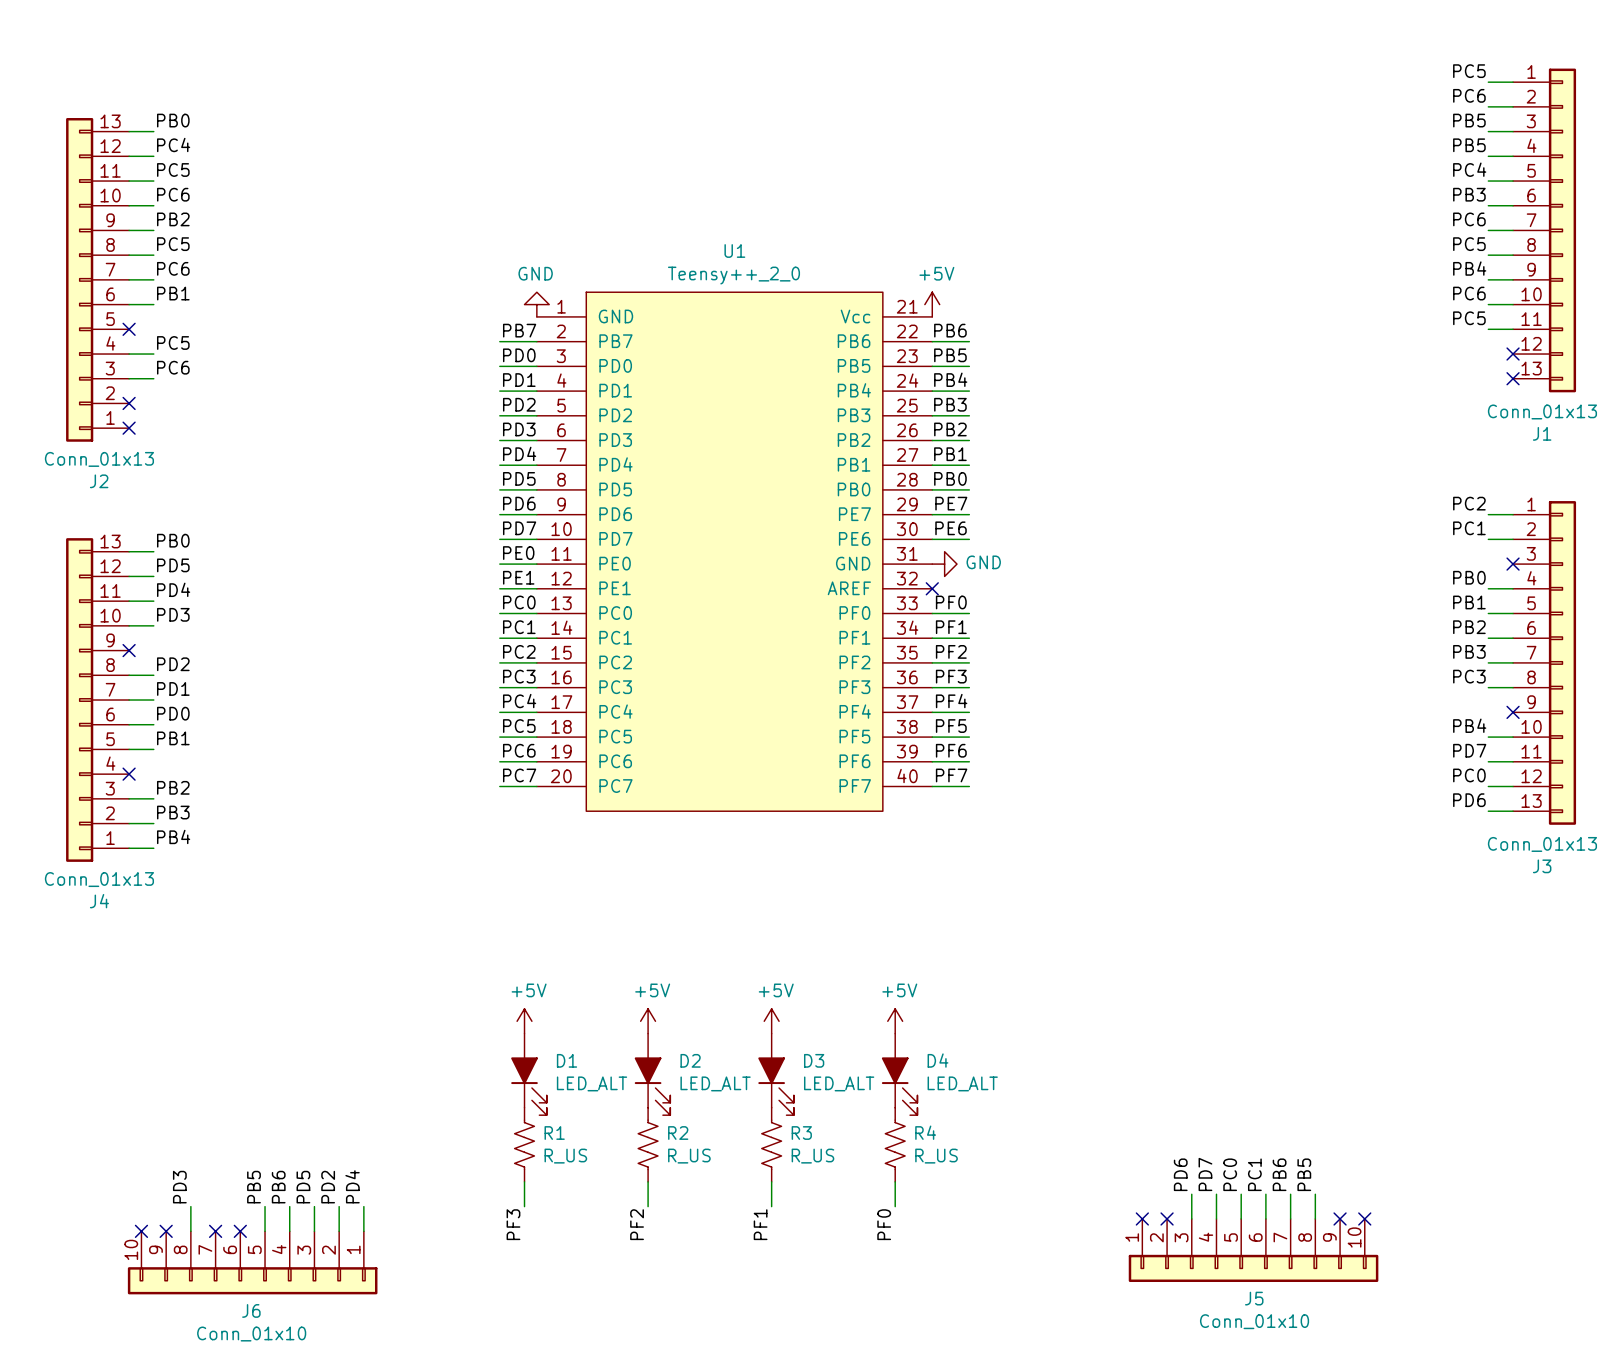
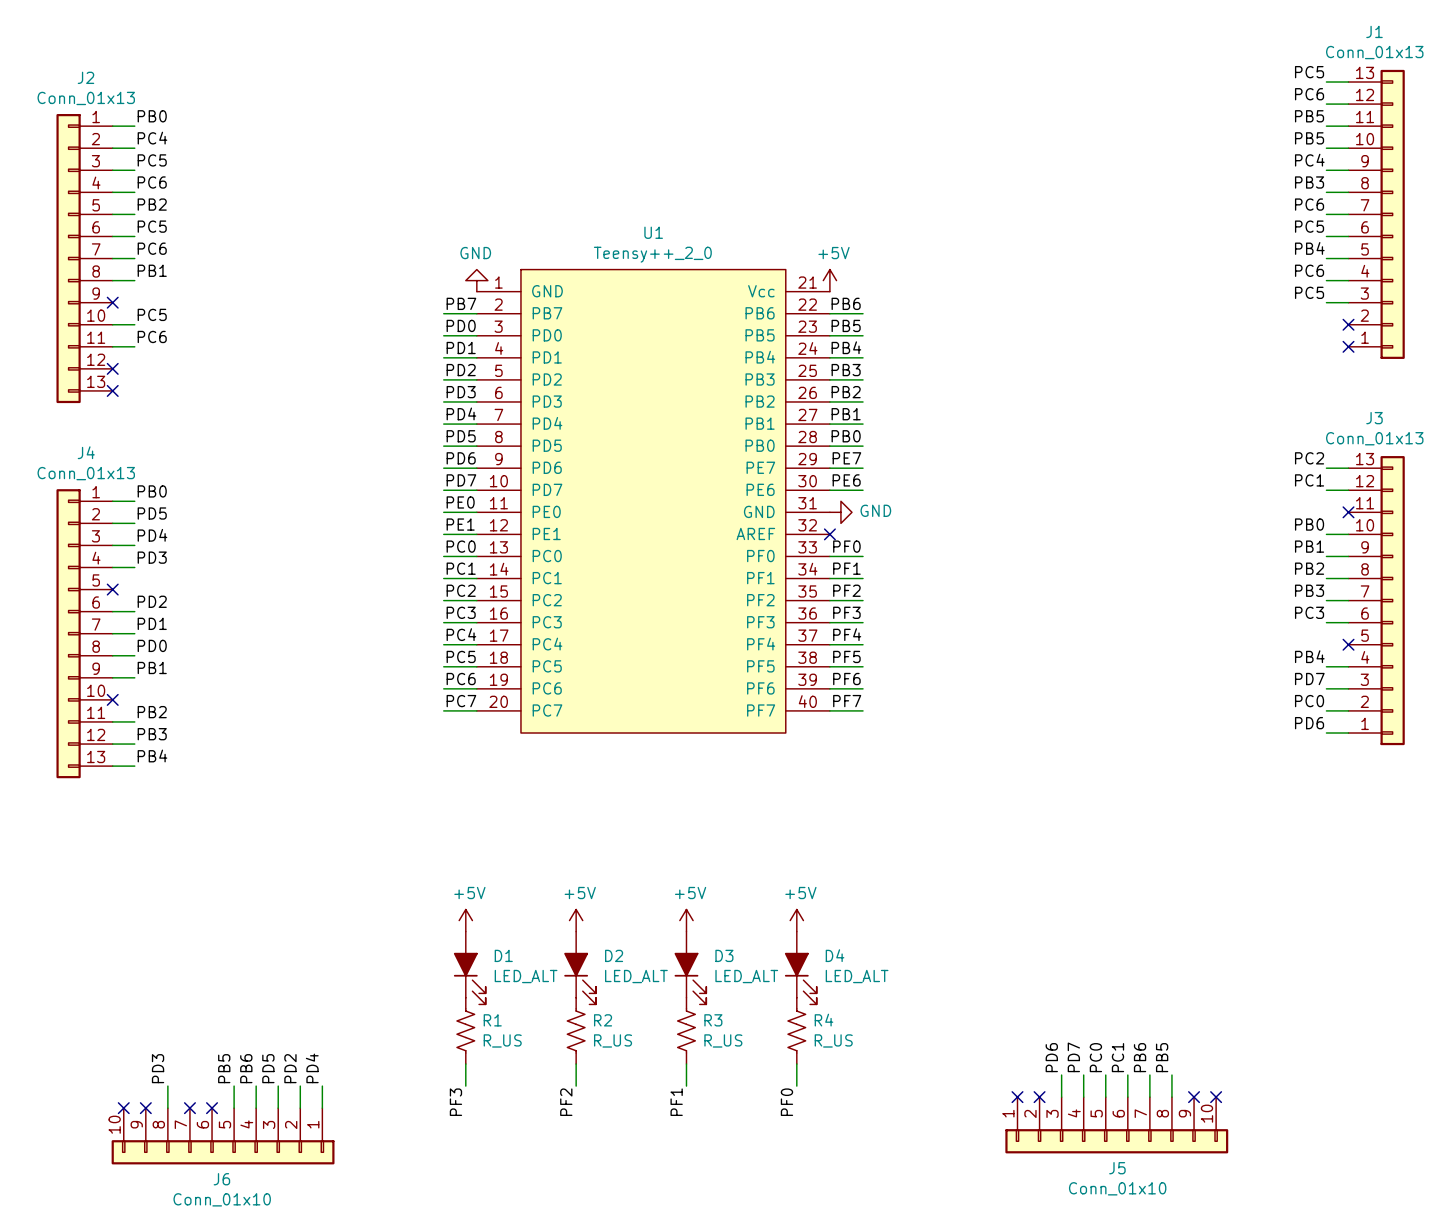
J1 flip: as is (1562, 230) -> up-down (1392, 214)
J2 flip: as is (79, 279) -> up-down (68, 258)
J3 flip: as is (1562, 662) -> up-down (1392, 600)
J4 flip: as is (79, 700) -> up-down (68, 633)

